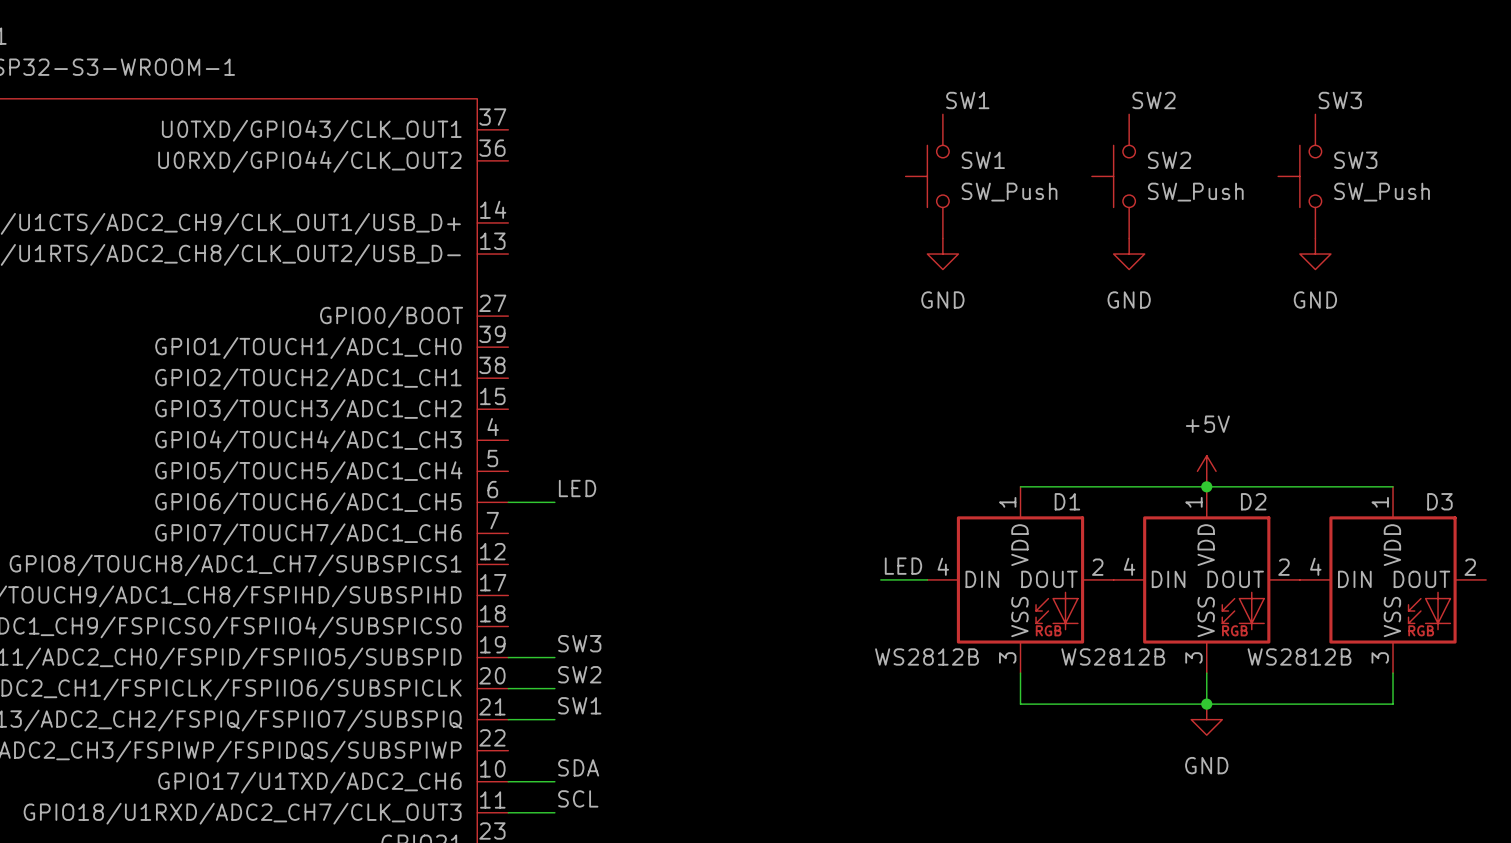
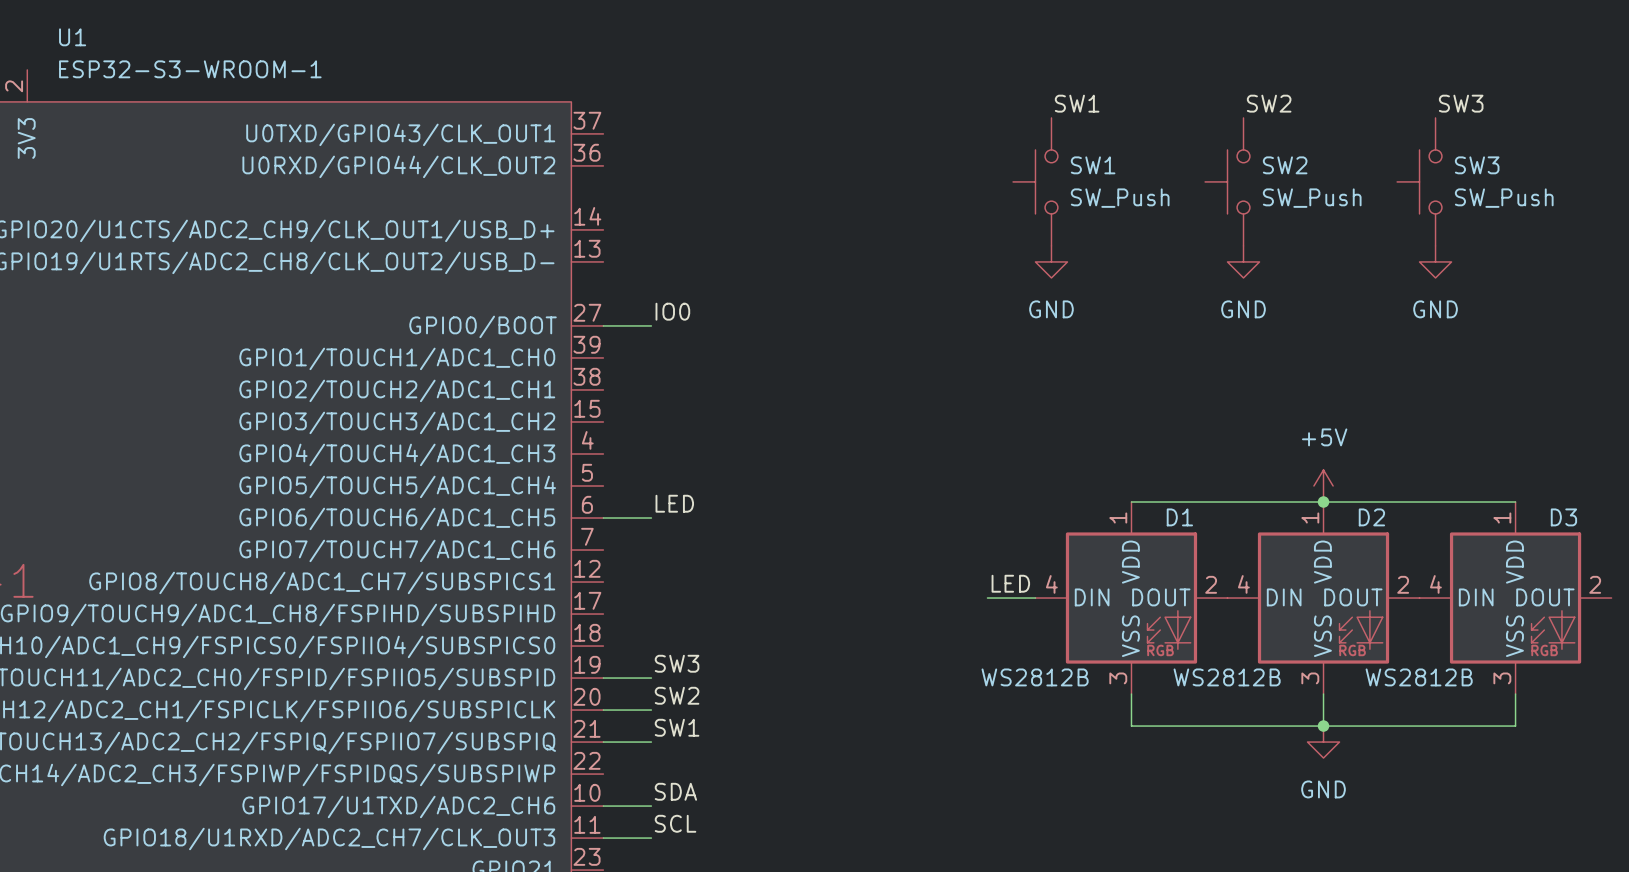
label: none -> IO0 (672, 311)
wire: none -> (603, 325) (651, 325)

